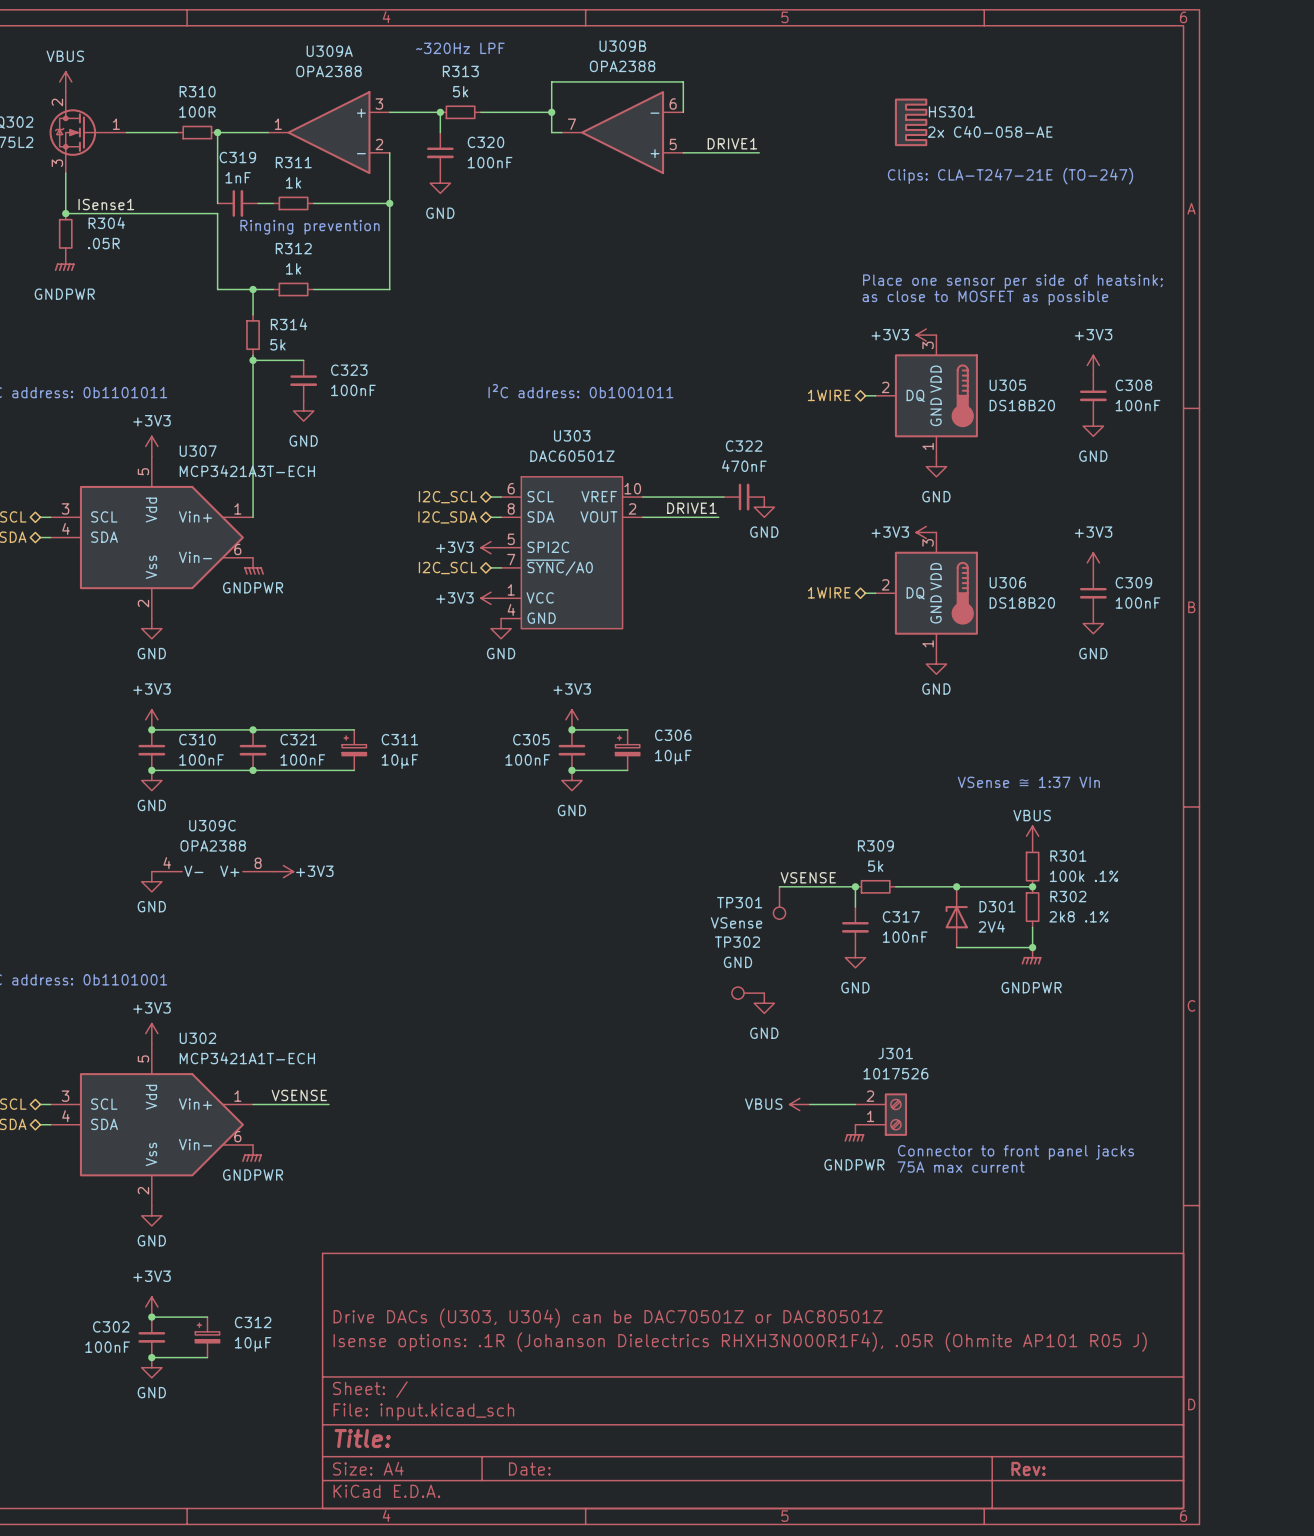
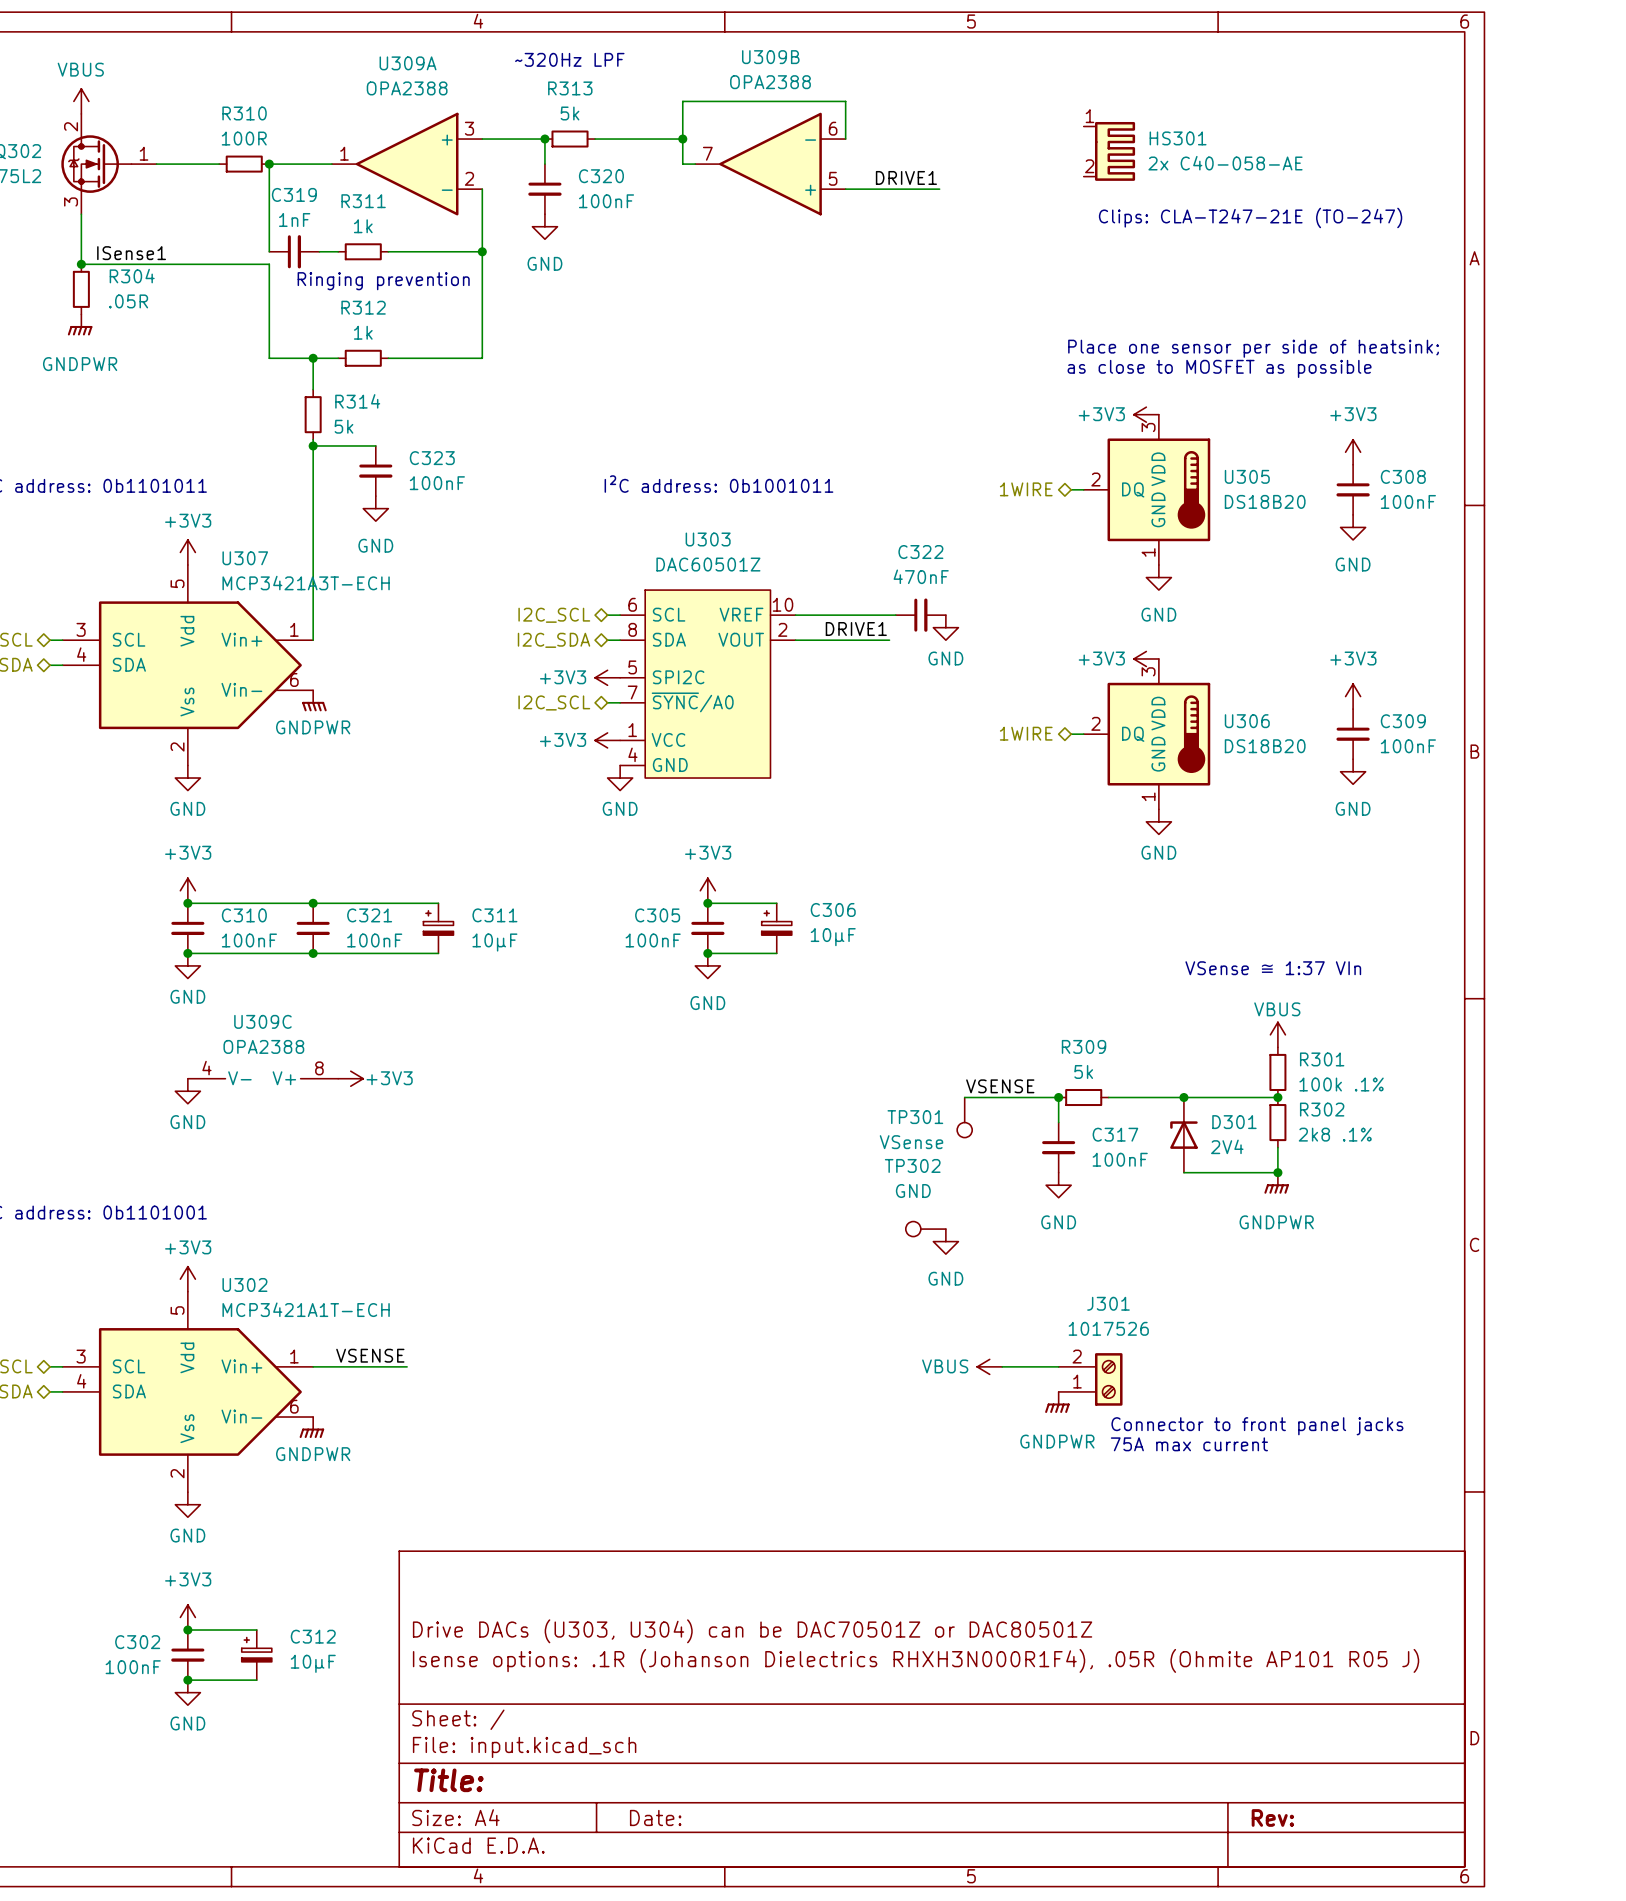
HS301 symbol: [894, 98, 928, 147] -> [1083, 121, 1136, 181]

